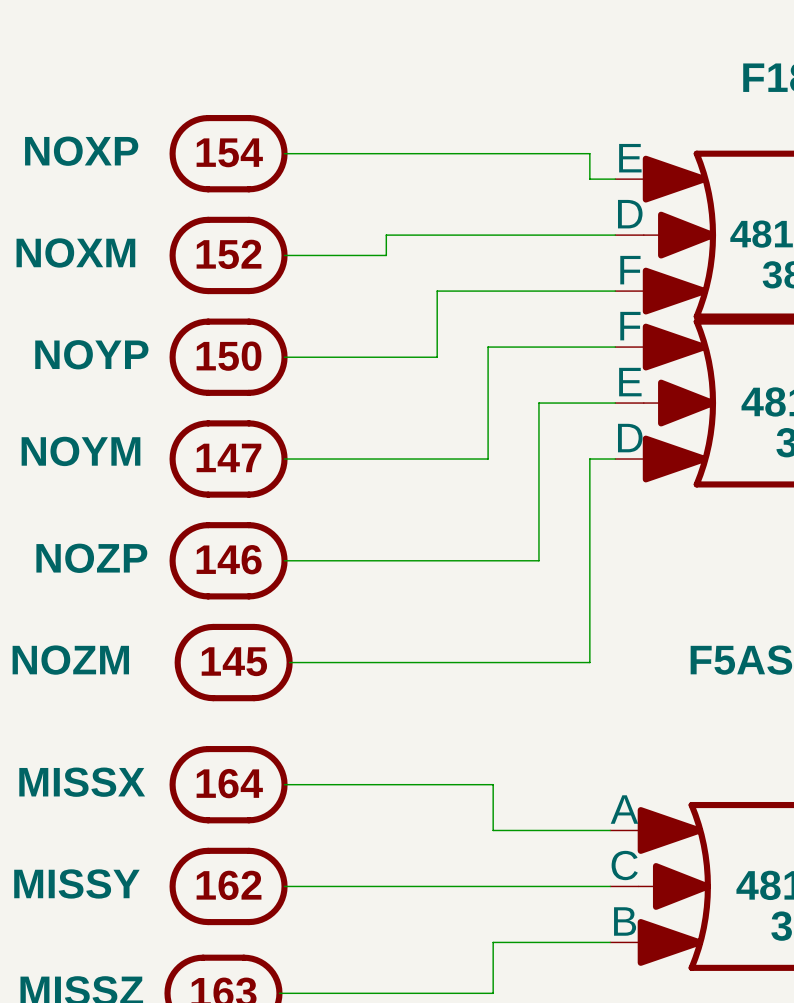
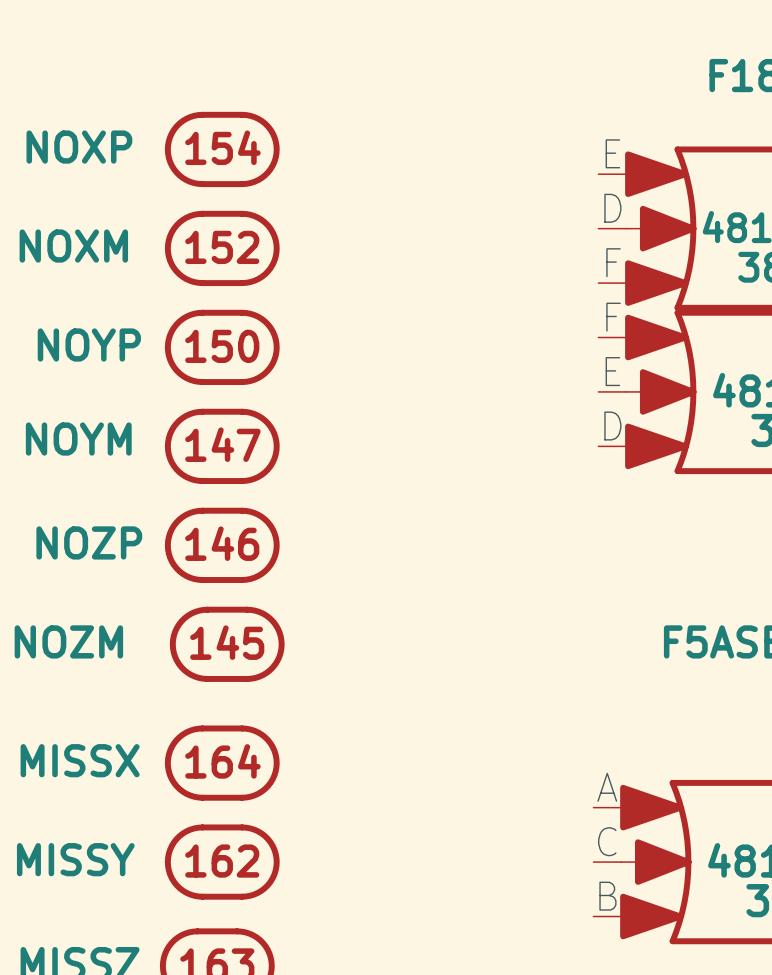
wire: (284, 153) (589, 153) (589, 179) (615, 179) -> none
wire: (615, 235) (386, 235) (386, 255) (284, 255) -> none
wire: (615, 291) (437, 291) (437, 357) (284, 357) -> none
wire: (615, 347) (488, 347) (488, 459) (284, 459) -> none
wire: (615, 403) (538, 403) (538, 560) (284, 560) -> none
wire: (615, 459) (589, 459) (589, 662) (289, 662) -> none
wire: (284, 784) (493, 784) (493, 830) (610, 830) -> none
wire: (284, 886) (610, 886) -> none
wire: (610, 942) (493, 942) (493, 993) (279, 993) -> none

